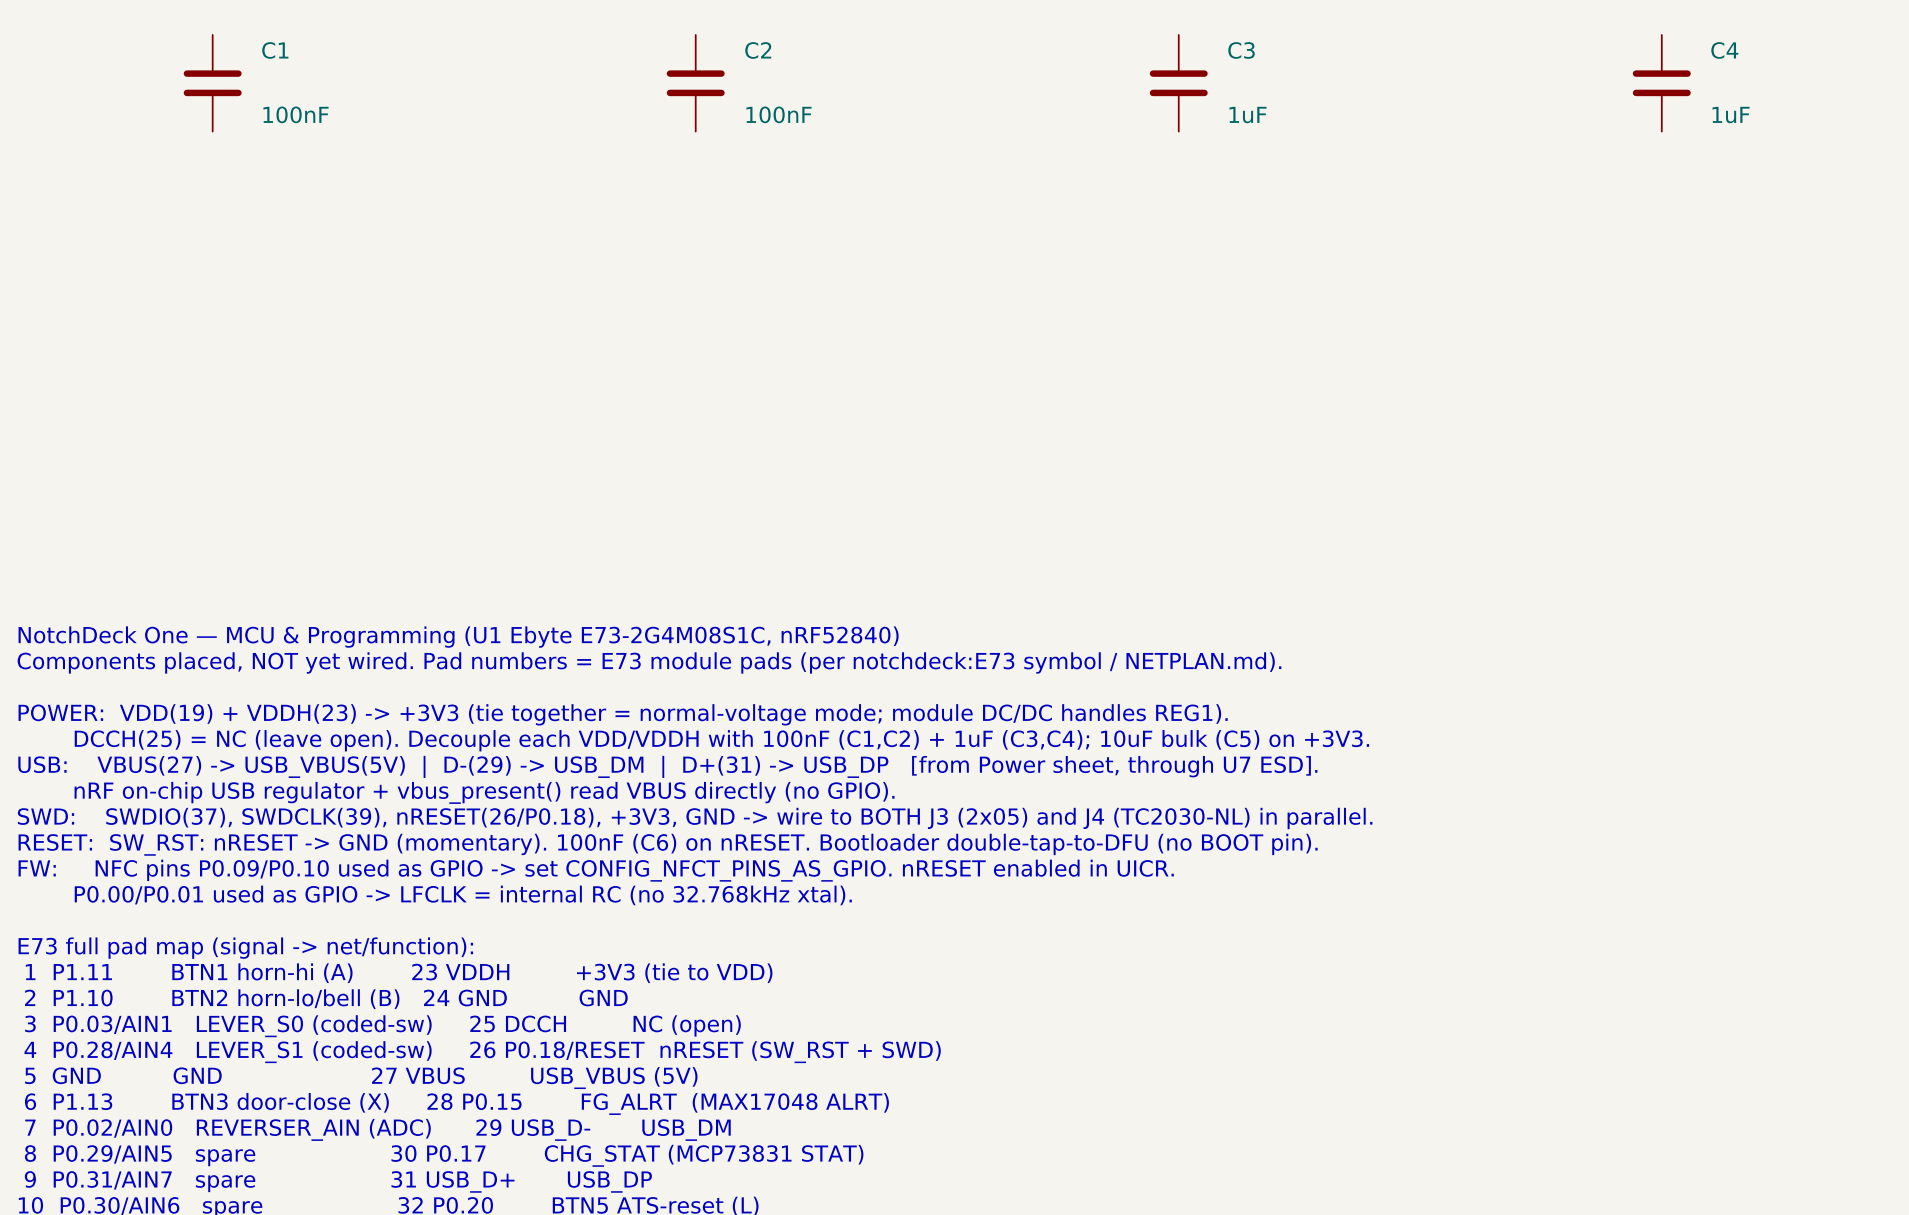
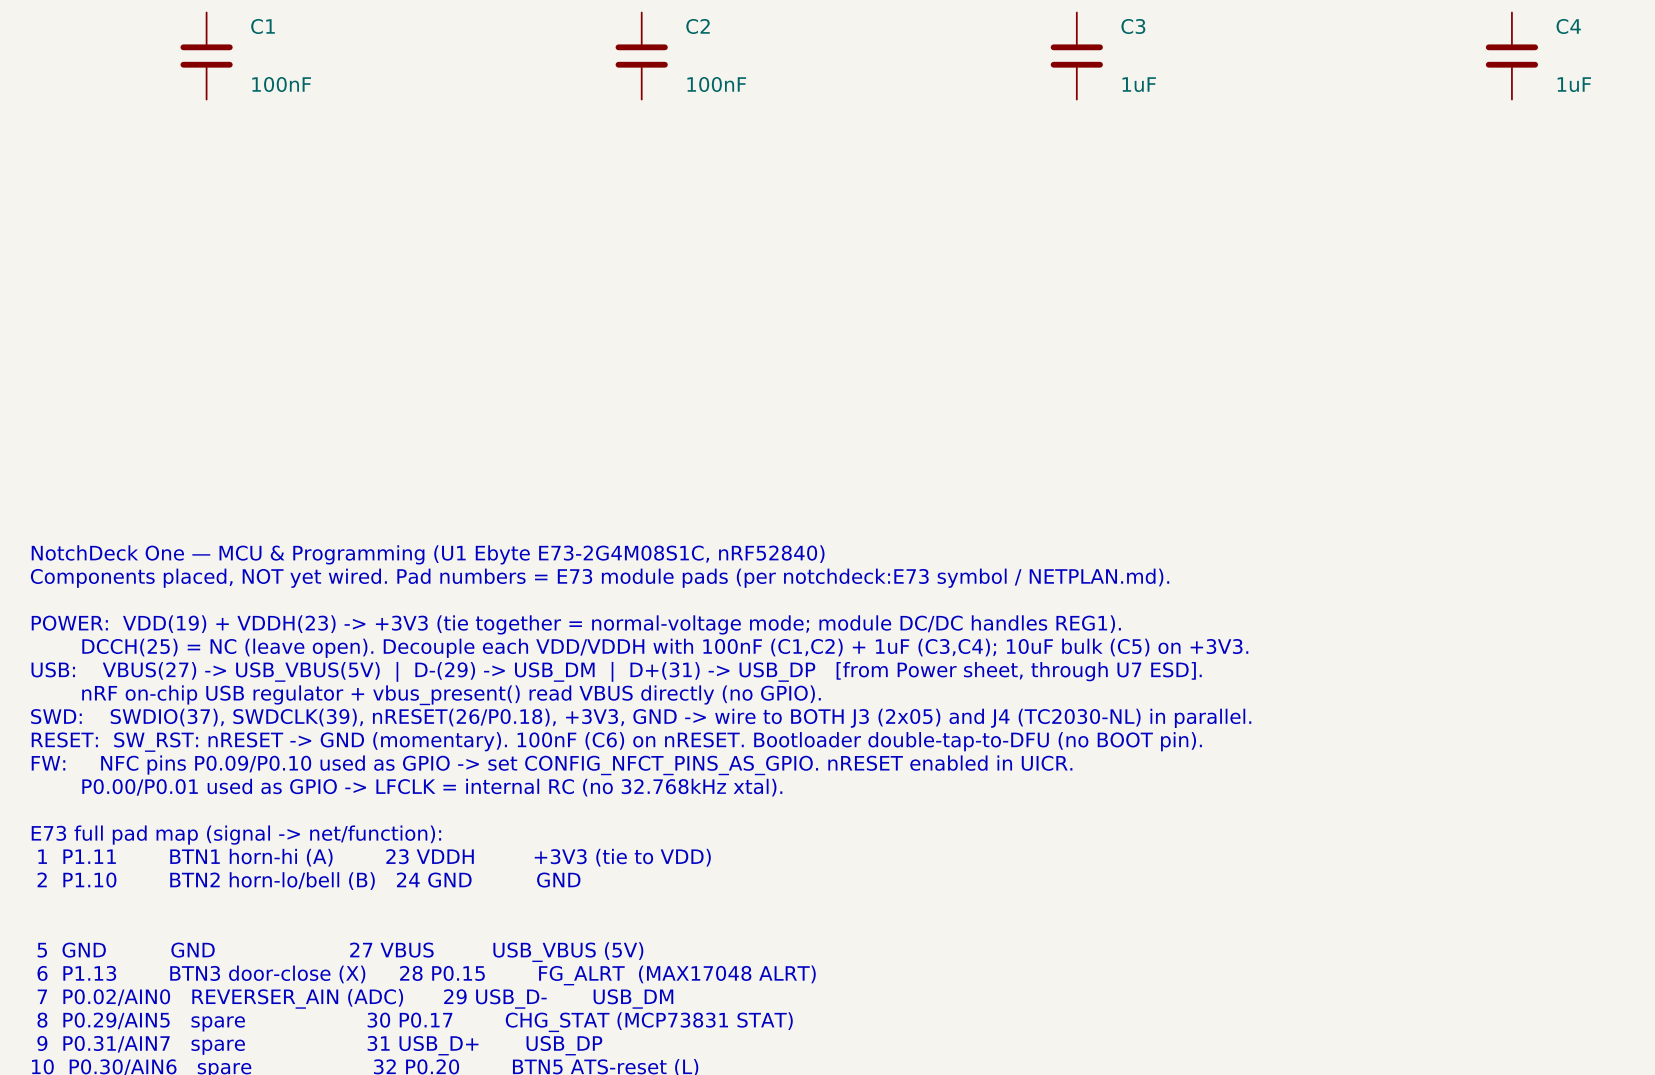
text: 3 P0.03/AIN1 LEVER_S0 (coded-sw) 25 DCCH NC (open) (382, 1026) -> none
text: 4 P0.28/AIN4 LEVER_S1 (coded-sw) 26 P0.18/RESET nRESET (SW_RST + SWD) (482, 1052) -> none

